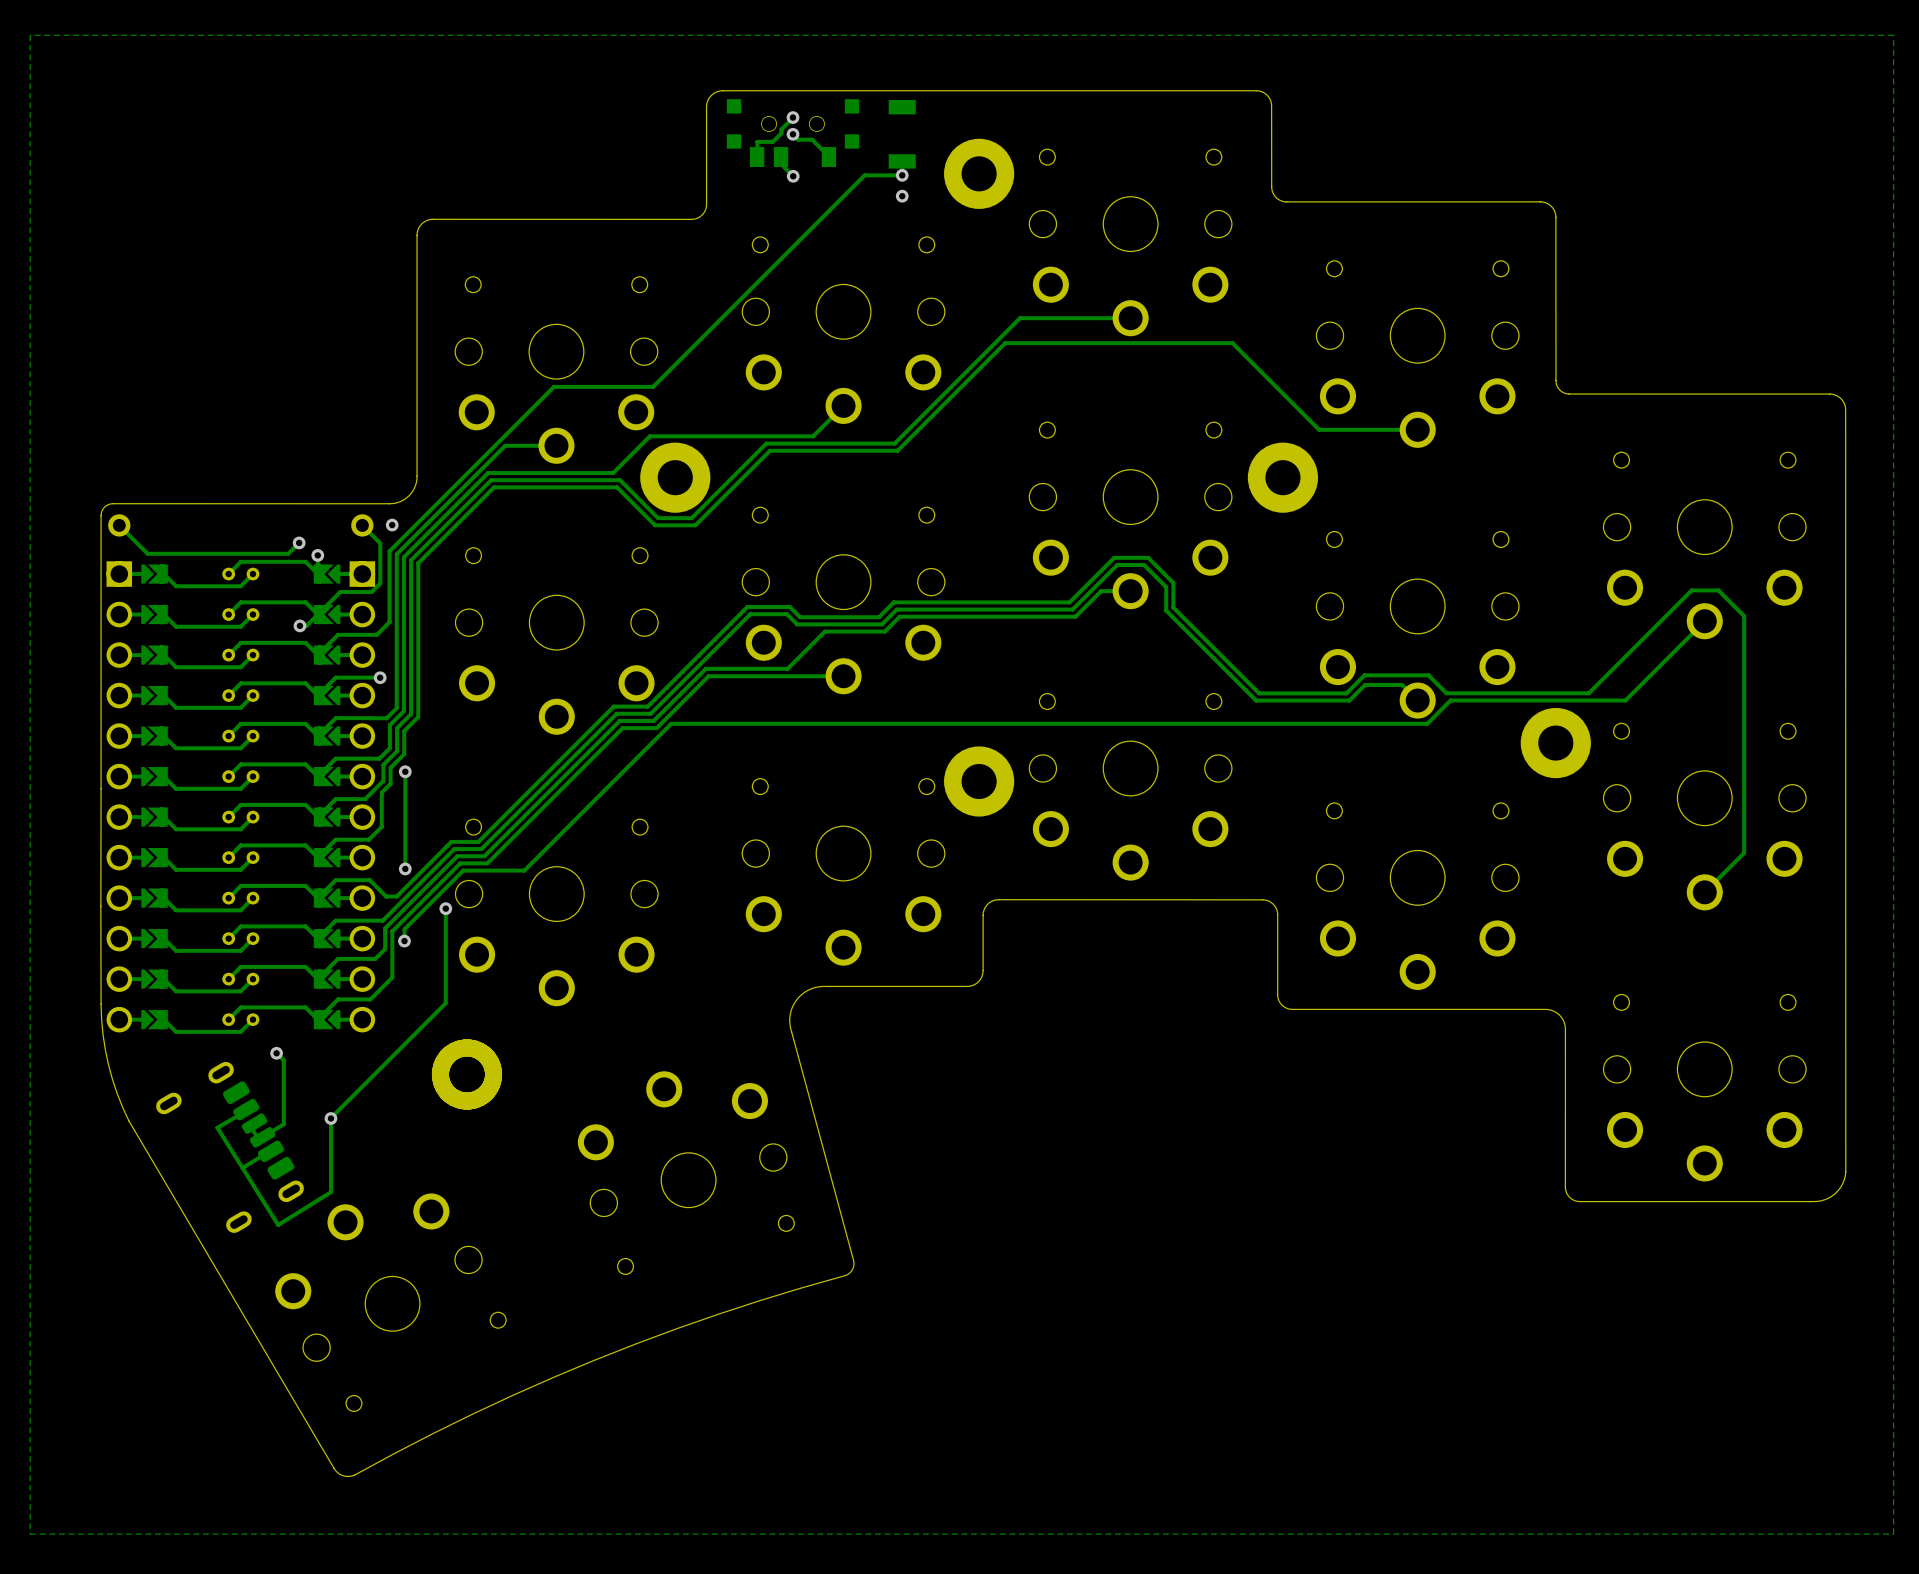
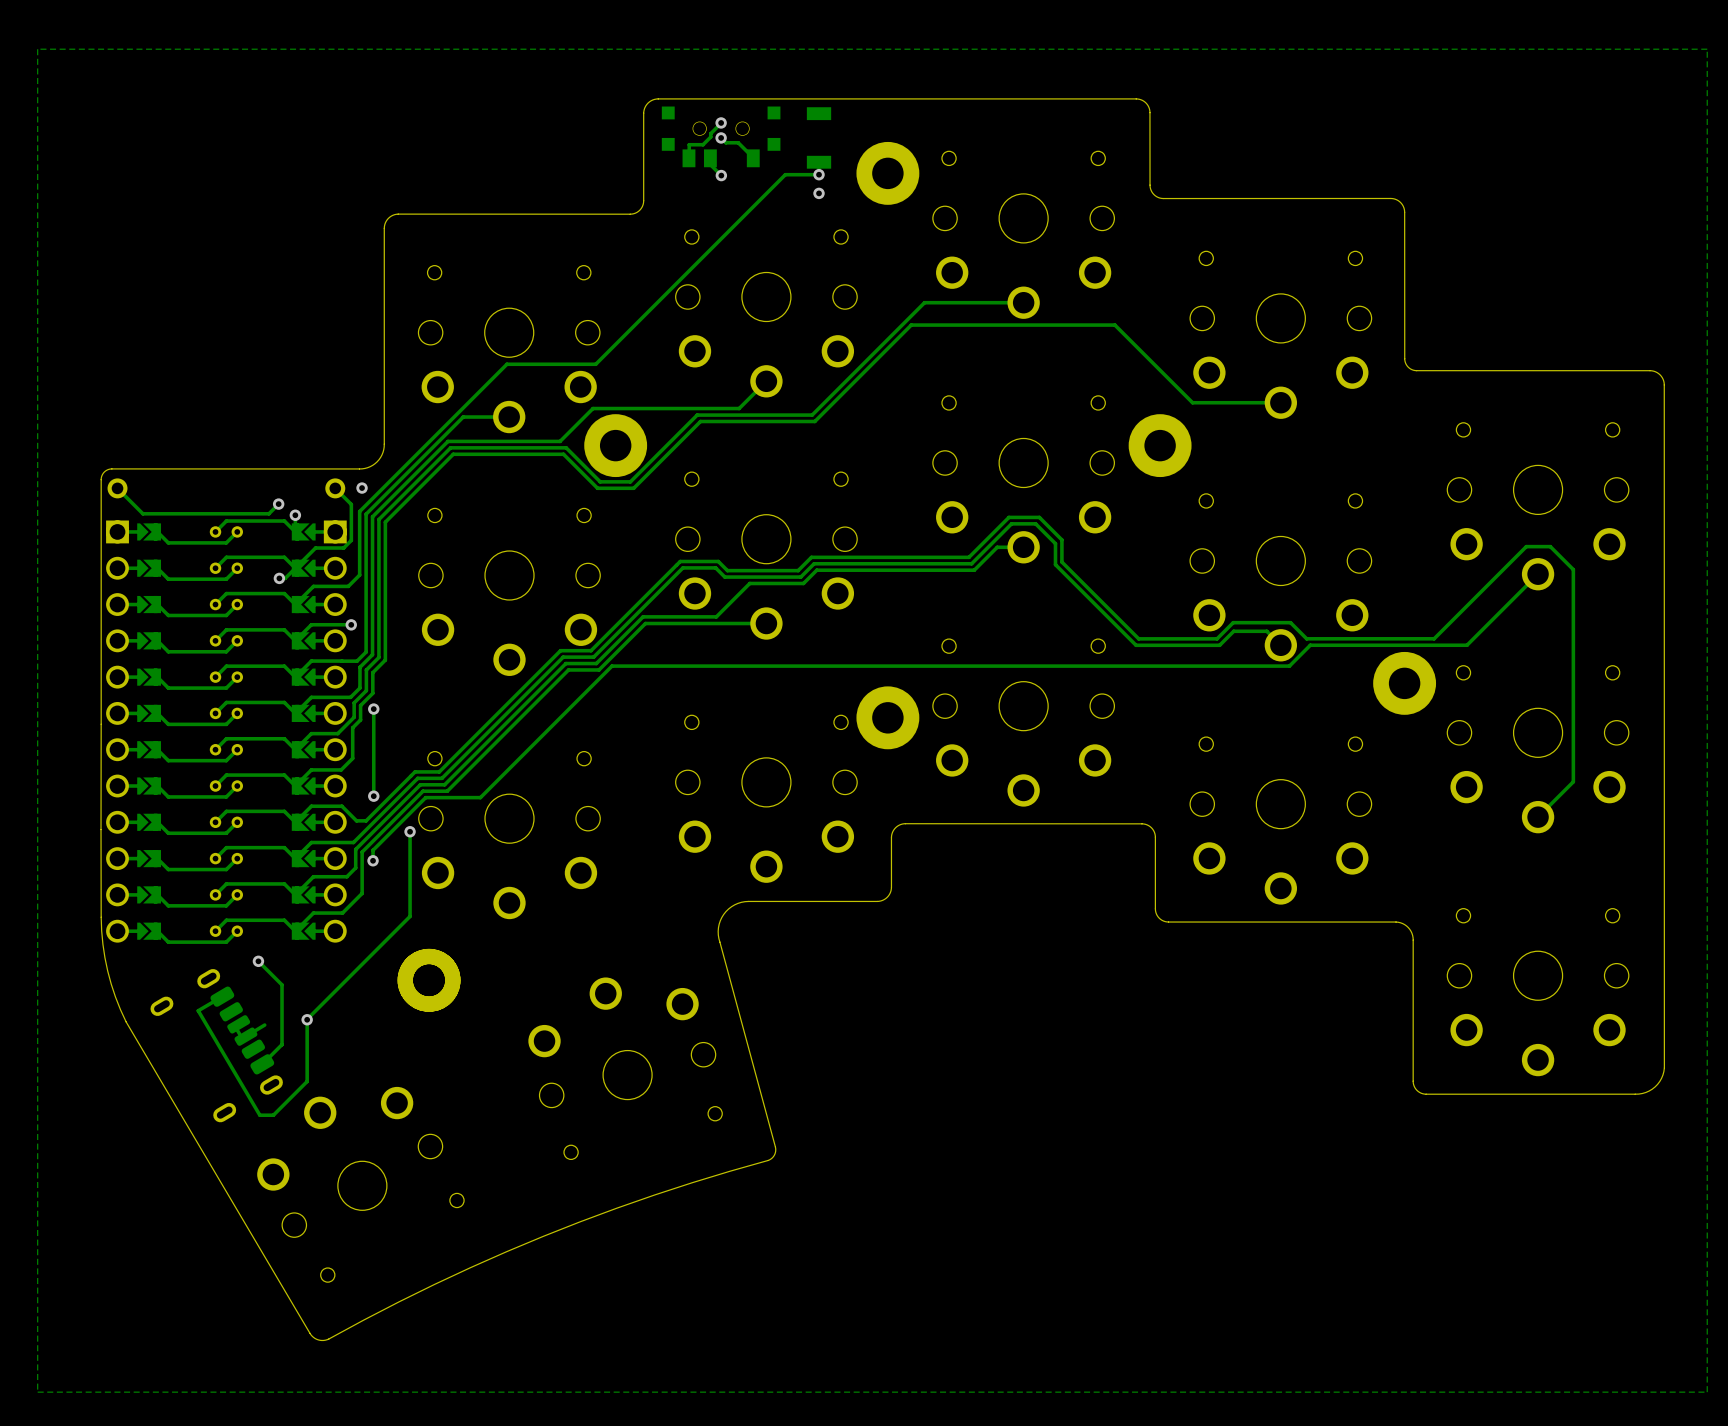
track: (283, 1060) (283, 1124) -> (264, 967) (282, 984) (282, 1044) (262, 1064)
track: (246, 1110) (217, 1127) (278, 1225) (330, 1192) (330, 1187) -> (219, 998) (198, 1010) (259, 1115) (273, 1115) (307, 1081)
track: (270, 1150) (242, 1167) -> none

